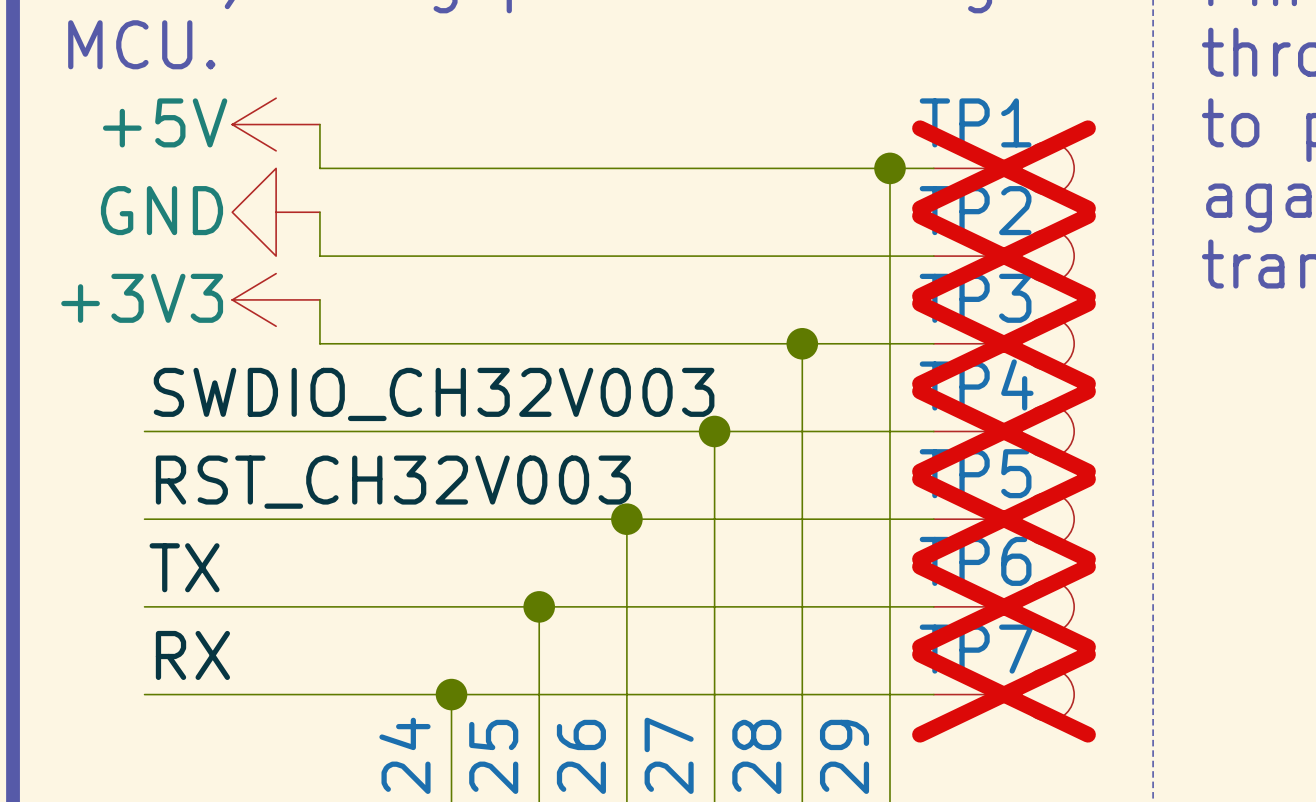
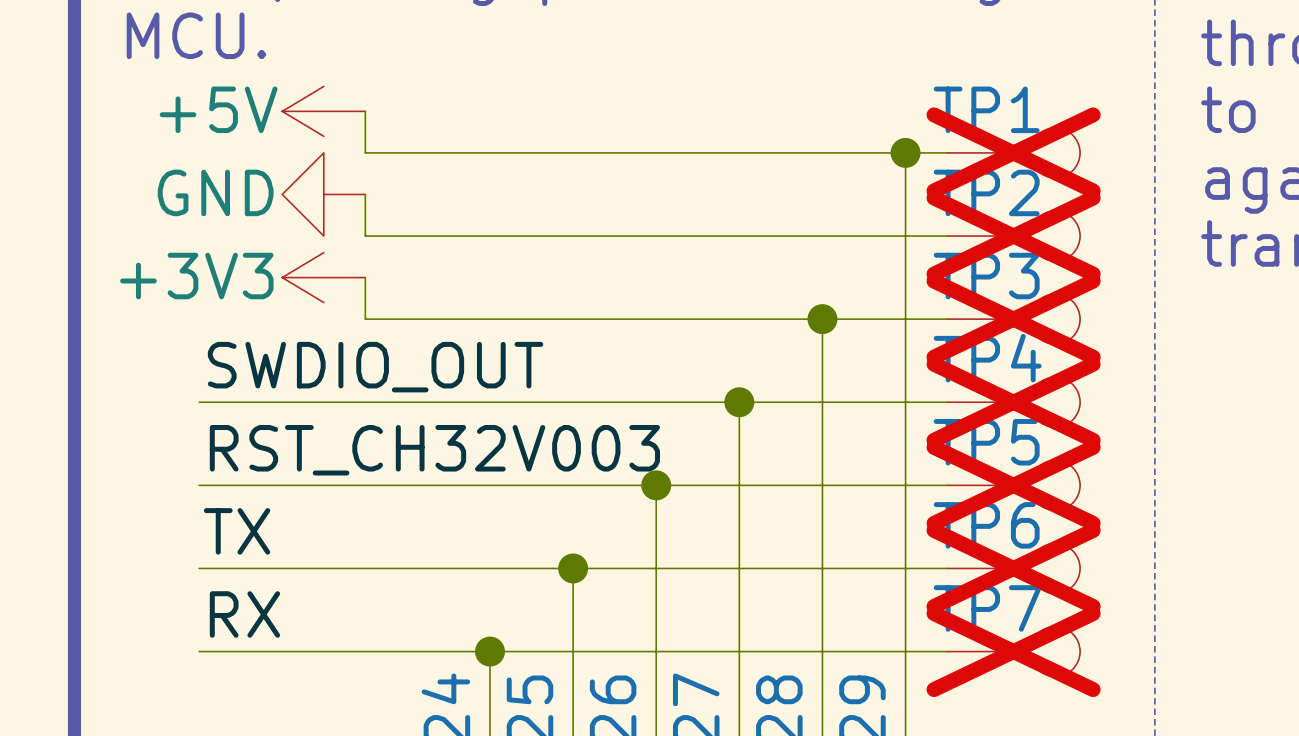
label: SWDIO_CH32V003 (434, 394) -> SWDIO_OUT (375, 367)

